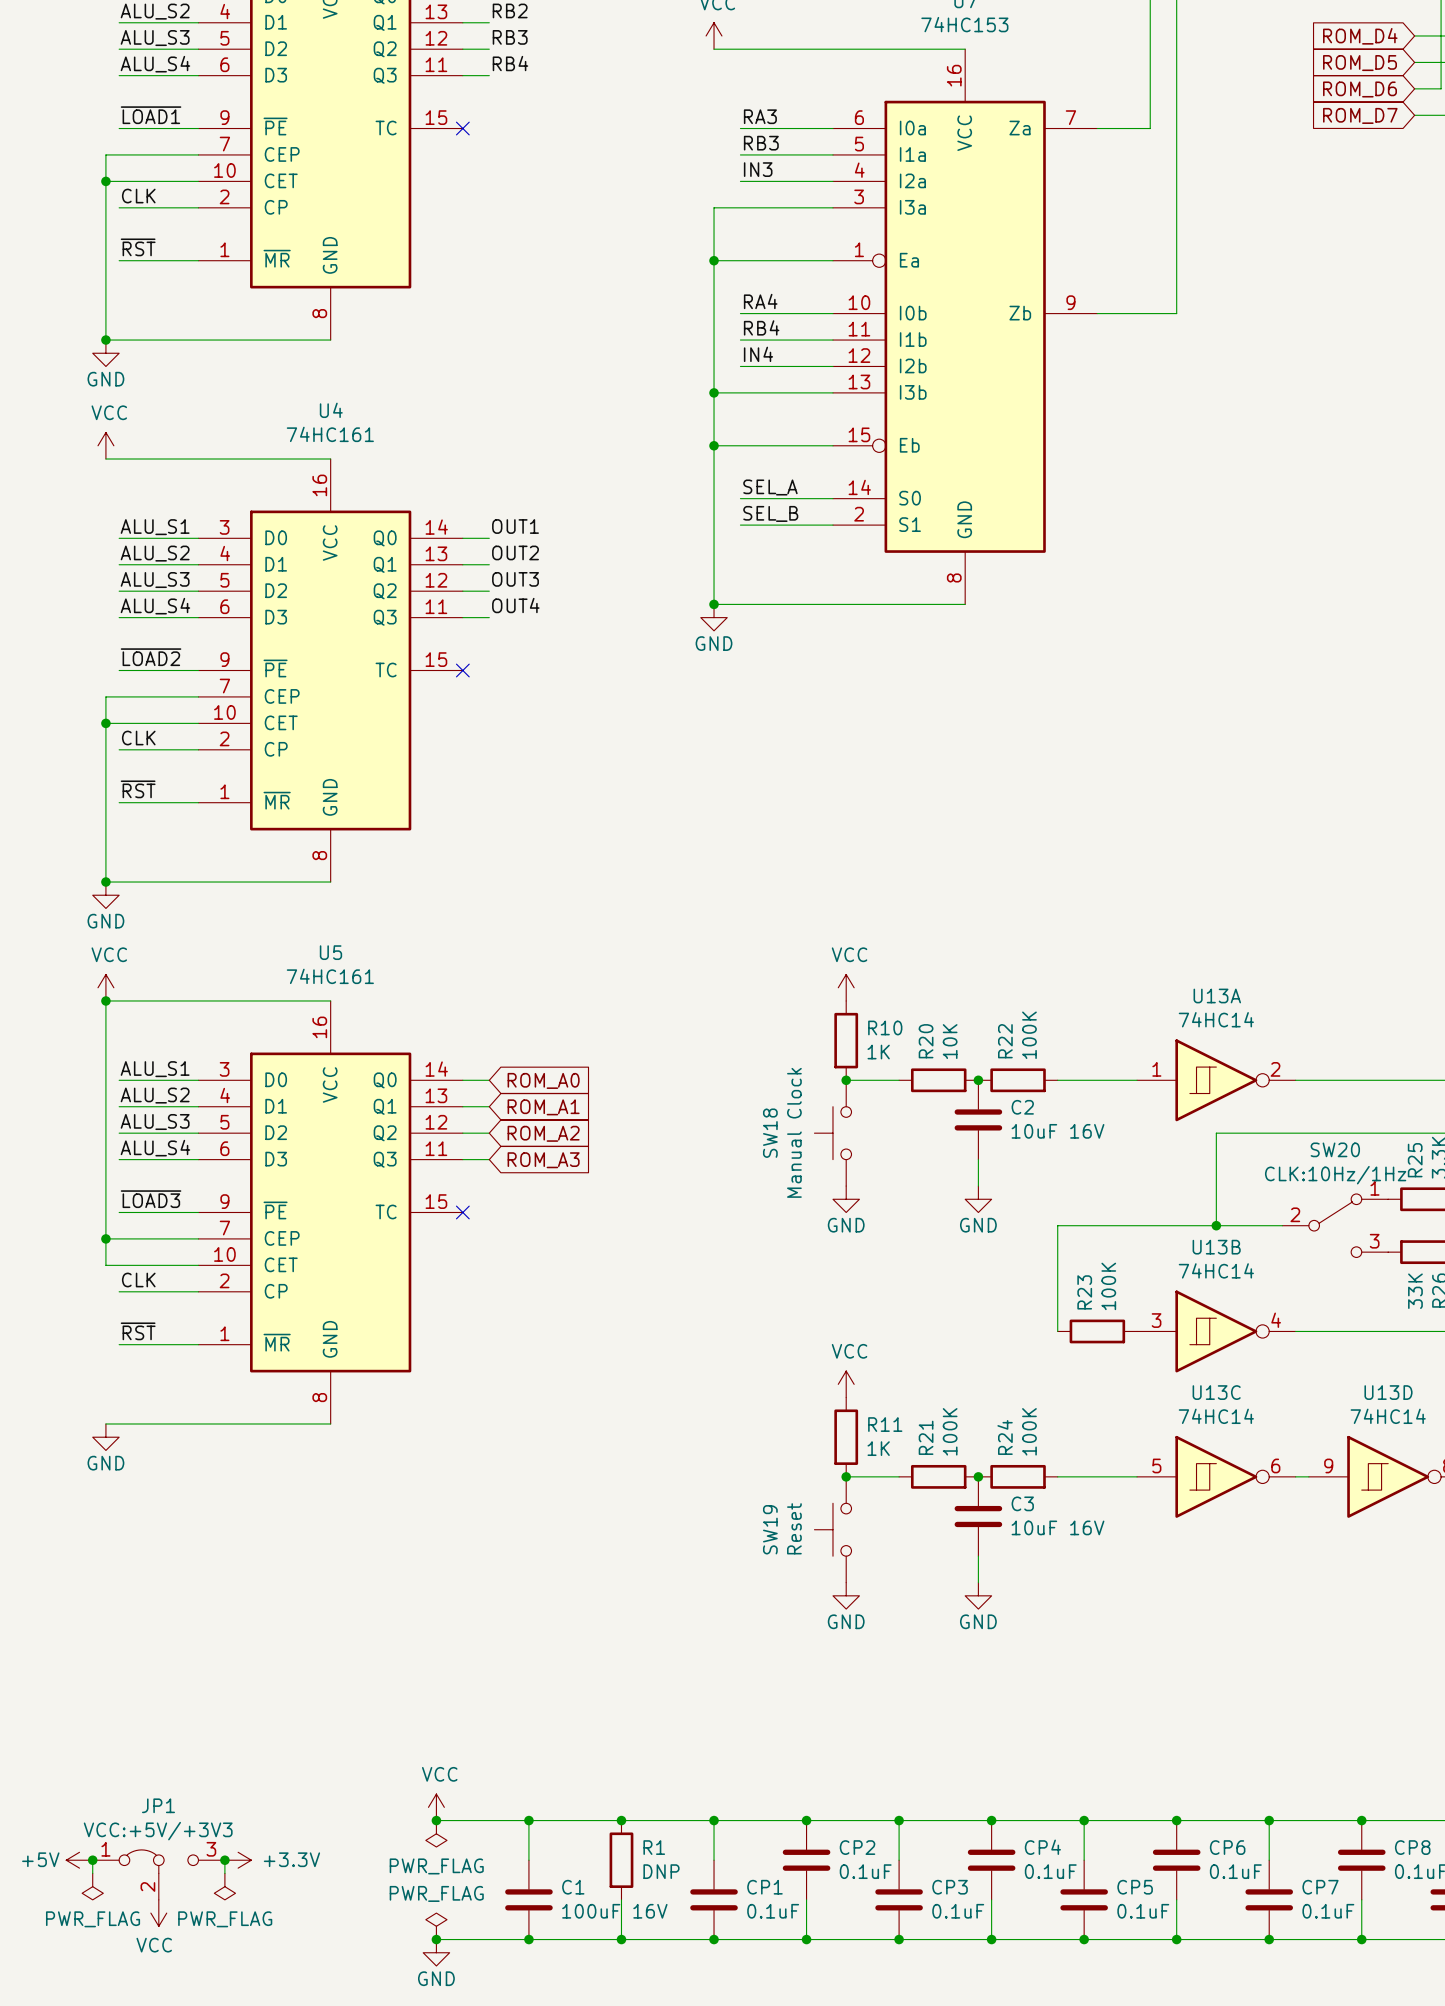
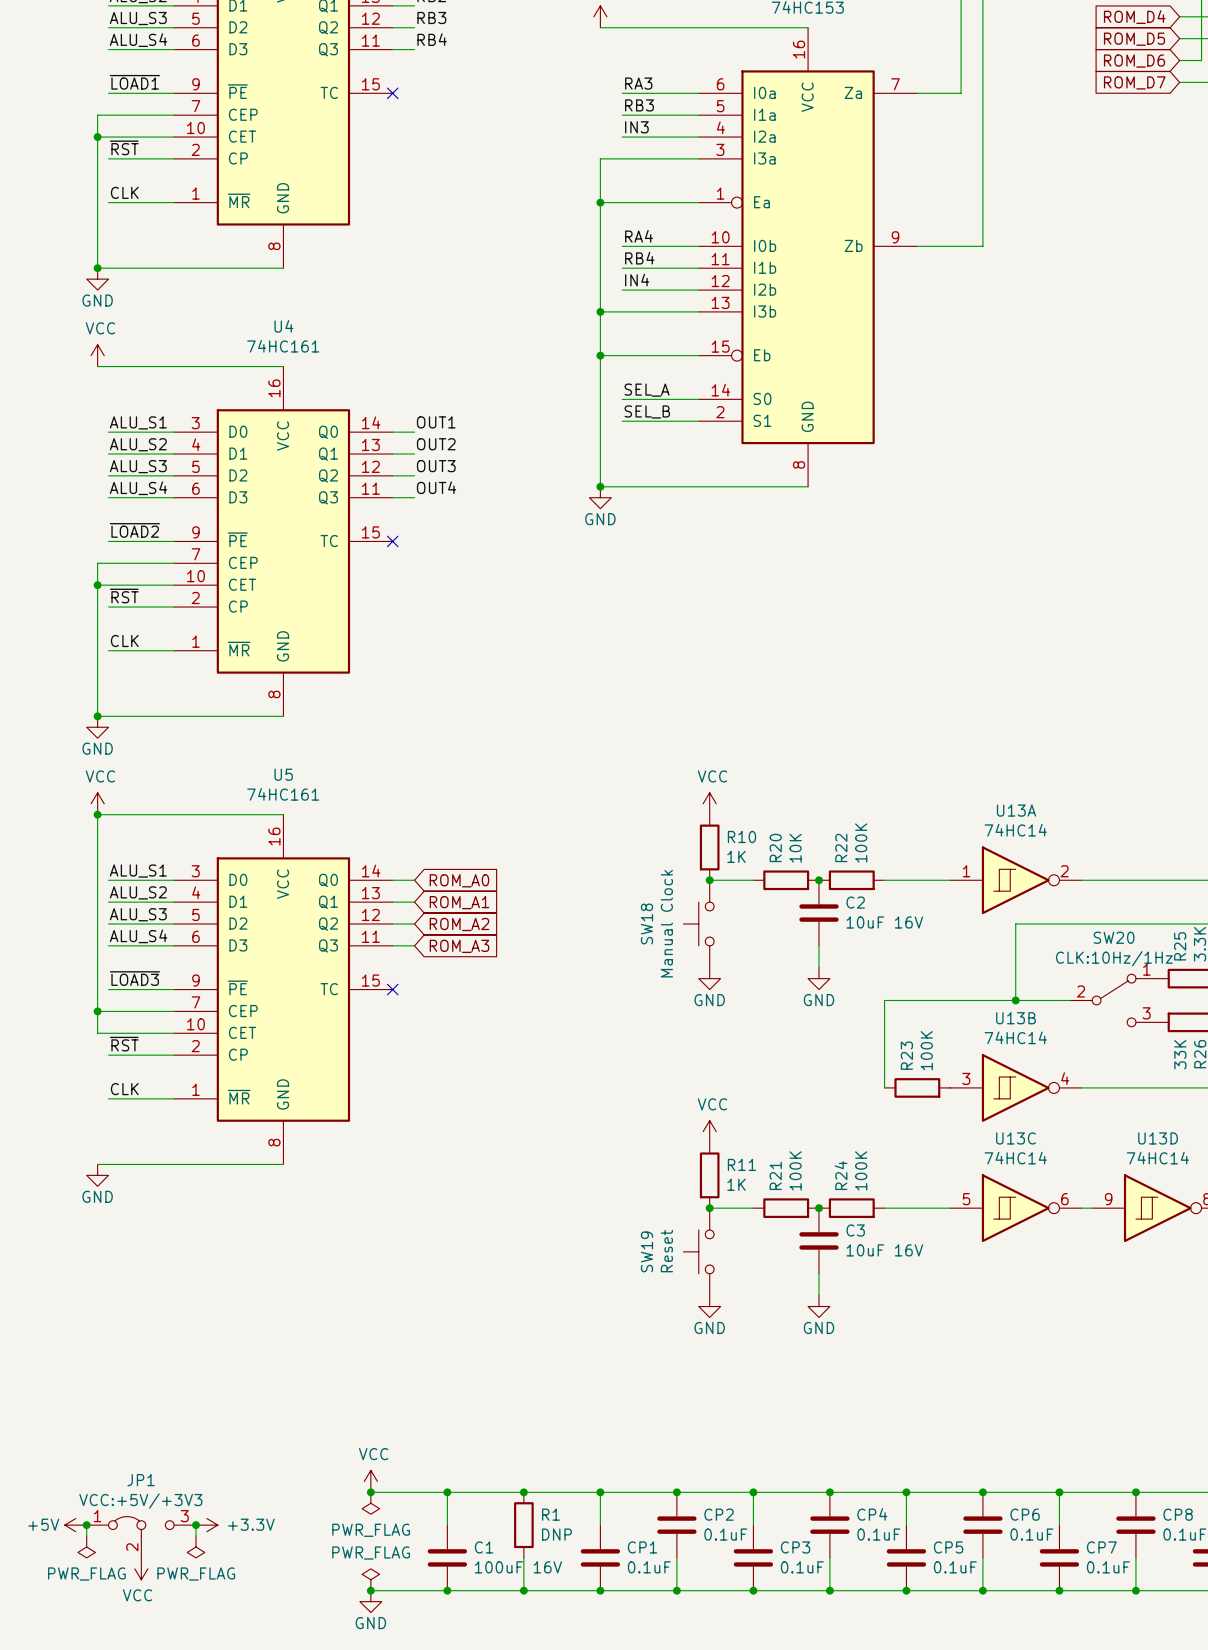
label: CLK (138, 196) -> ~{RST} (124, 147)
label: ~{RST} (138, 247) -> CLK (124, 192)
label: CLK (138, 738) -> ~{RST} (124, 596)
label: ~{RST} (138, 789) -> CLK (124, 640)
label: CLK (138, 1280) -> ~{RST} (124, 1044)
label: ~{RST} (138, 1331) -> CLK (124, 1089)

